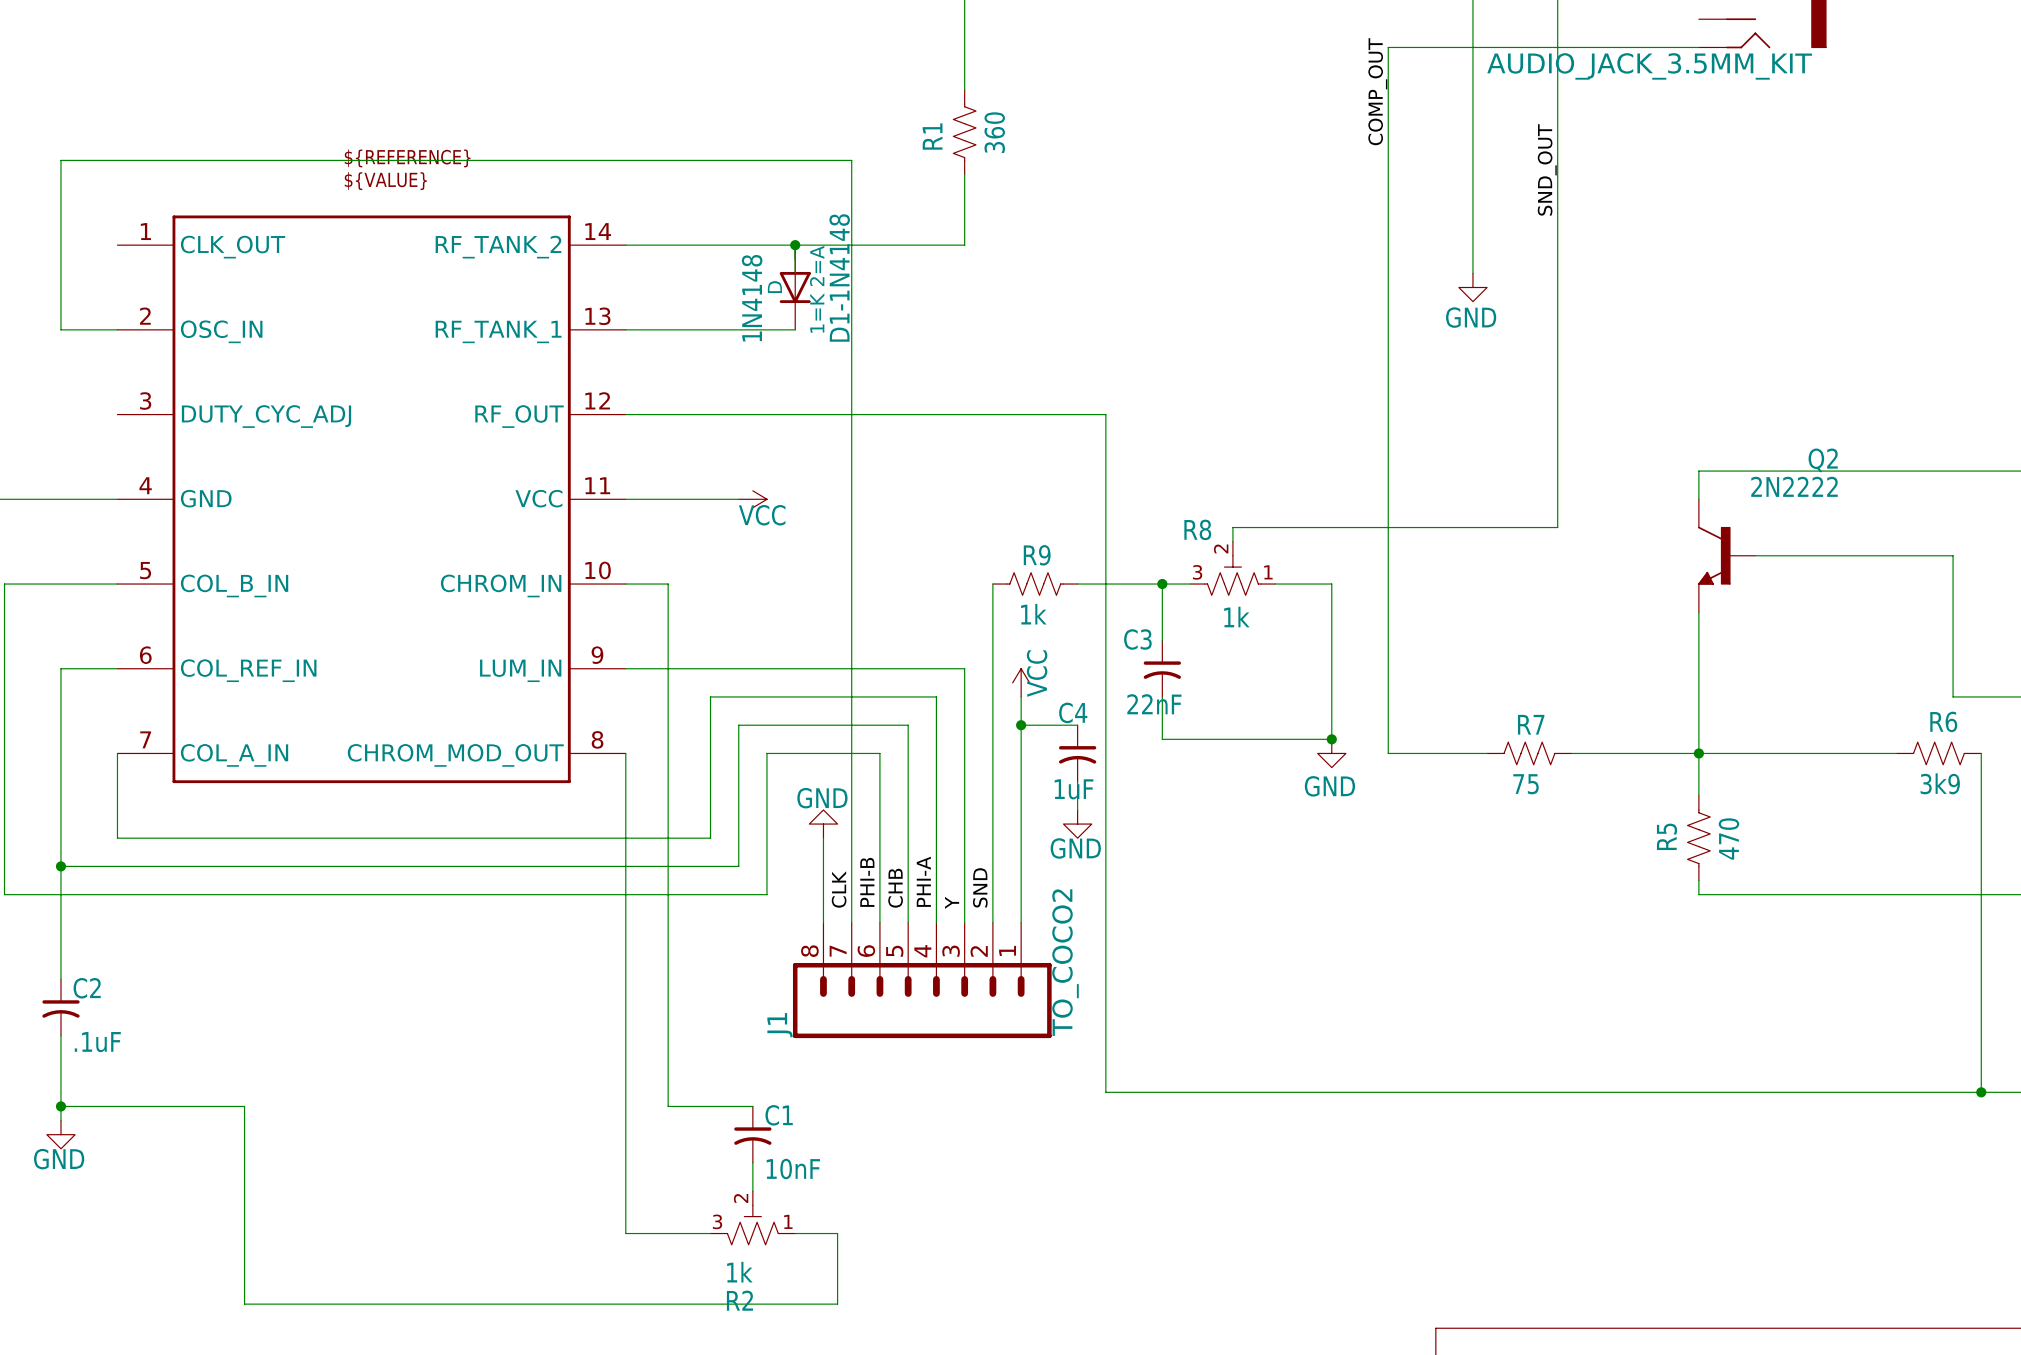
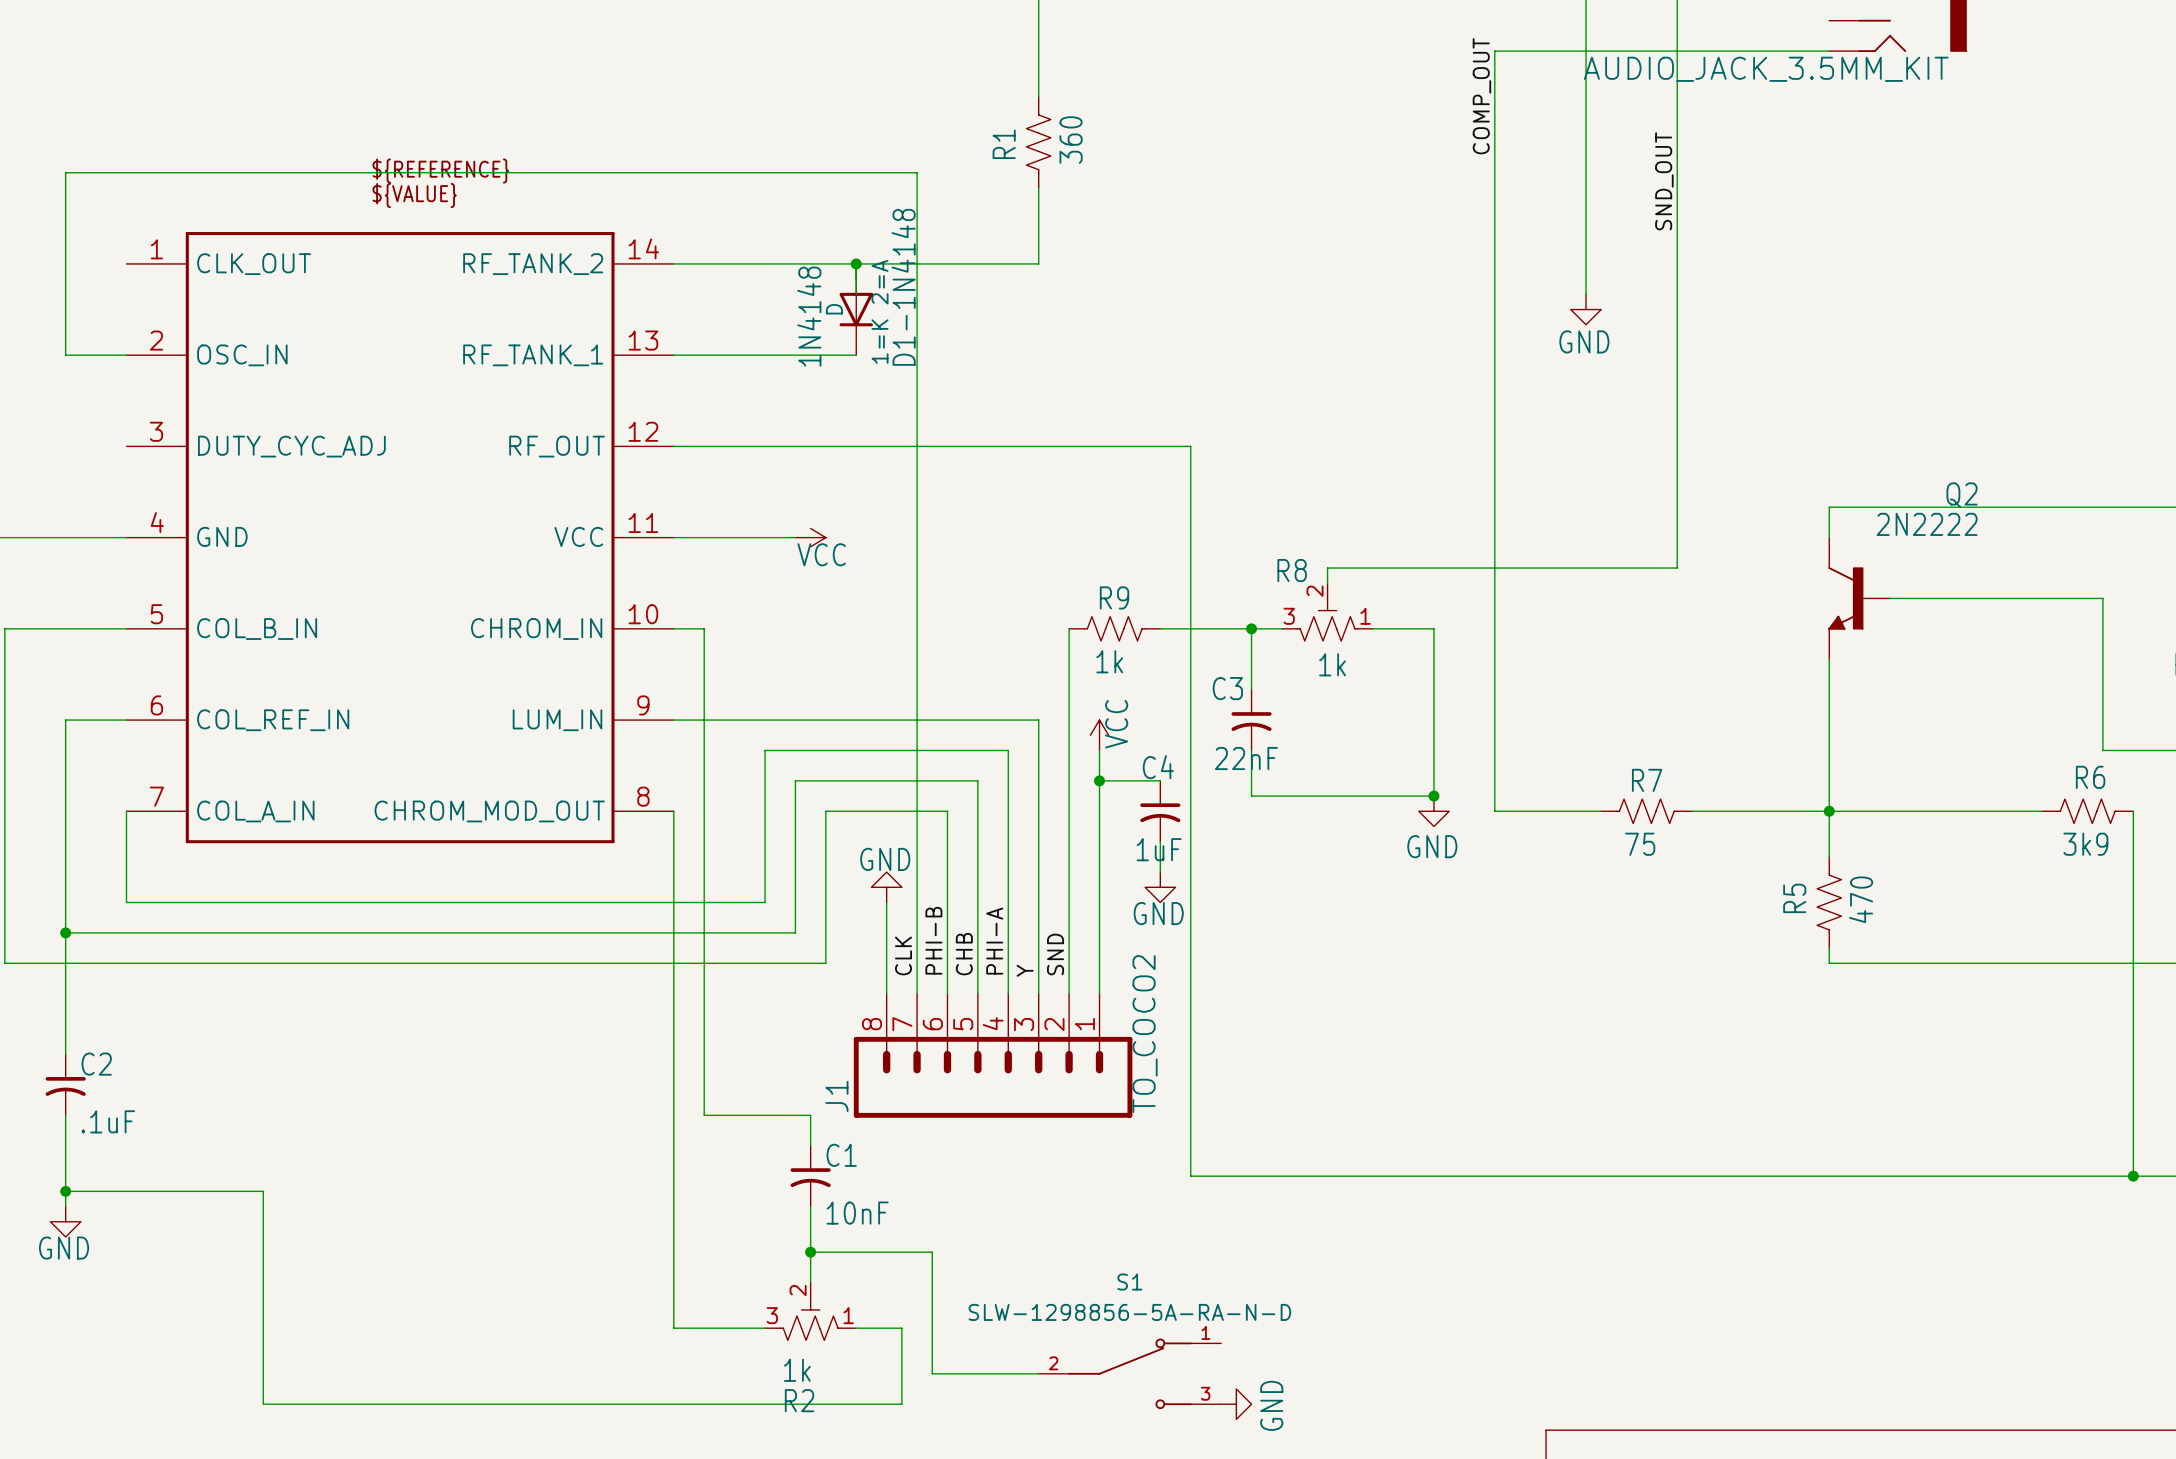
wire: (654, 584) (668, 584) (668, 1106) (752, 1106) -> (704, 628) (704, 1115) (810, 1115) (810, 1145)
wire: none -> (810, 1206) (810, 1252) (932, 1252) (932, 1373) (1038, 1373)
C1 position: (752, 1134) -> (810, 1176)
junction: none -> (810, 1252)
S1: none -> SLW-1298856-5A-RA-N-D (1129, 1373)
power symbol: none -> GND (1236, 1404)

